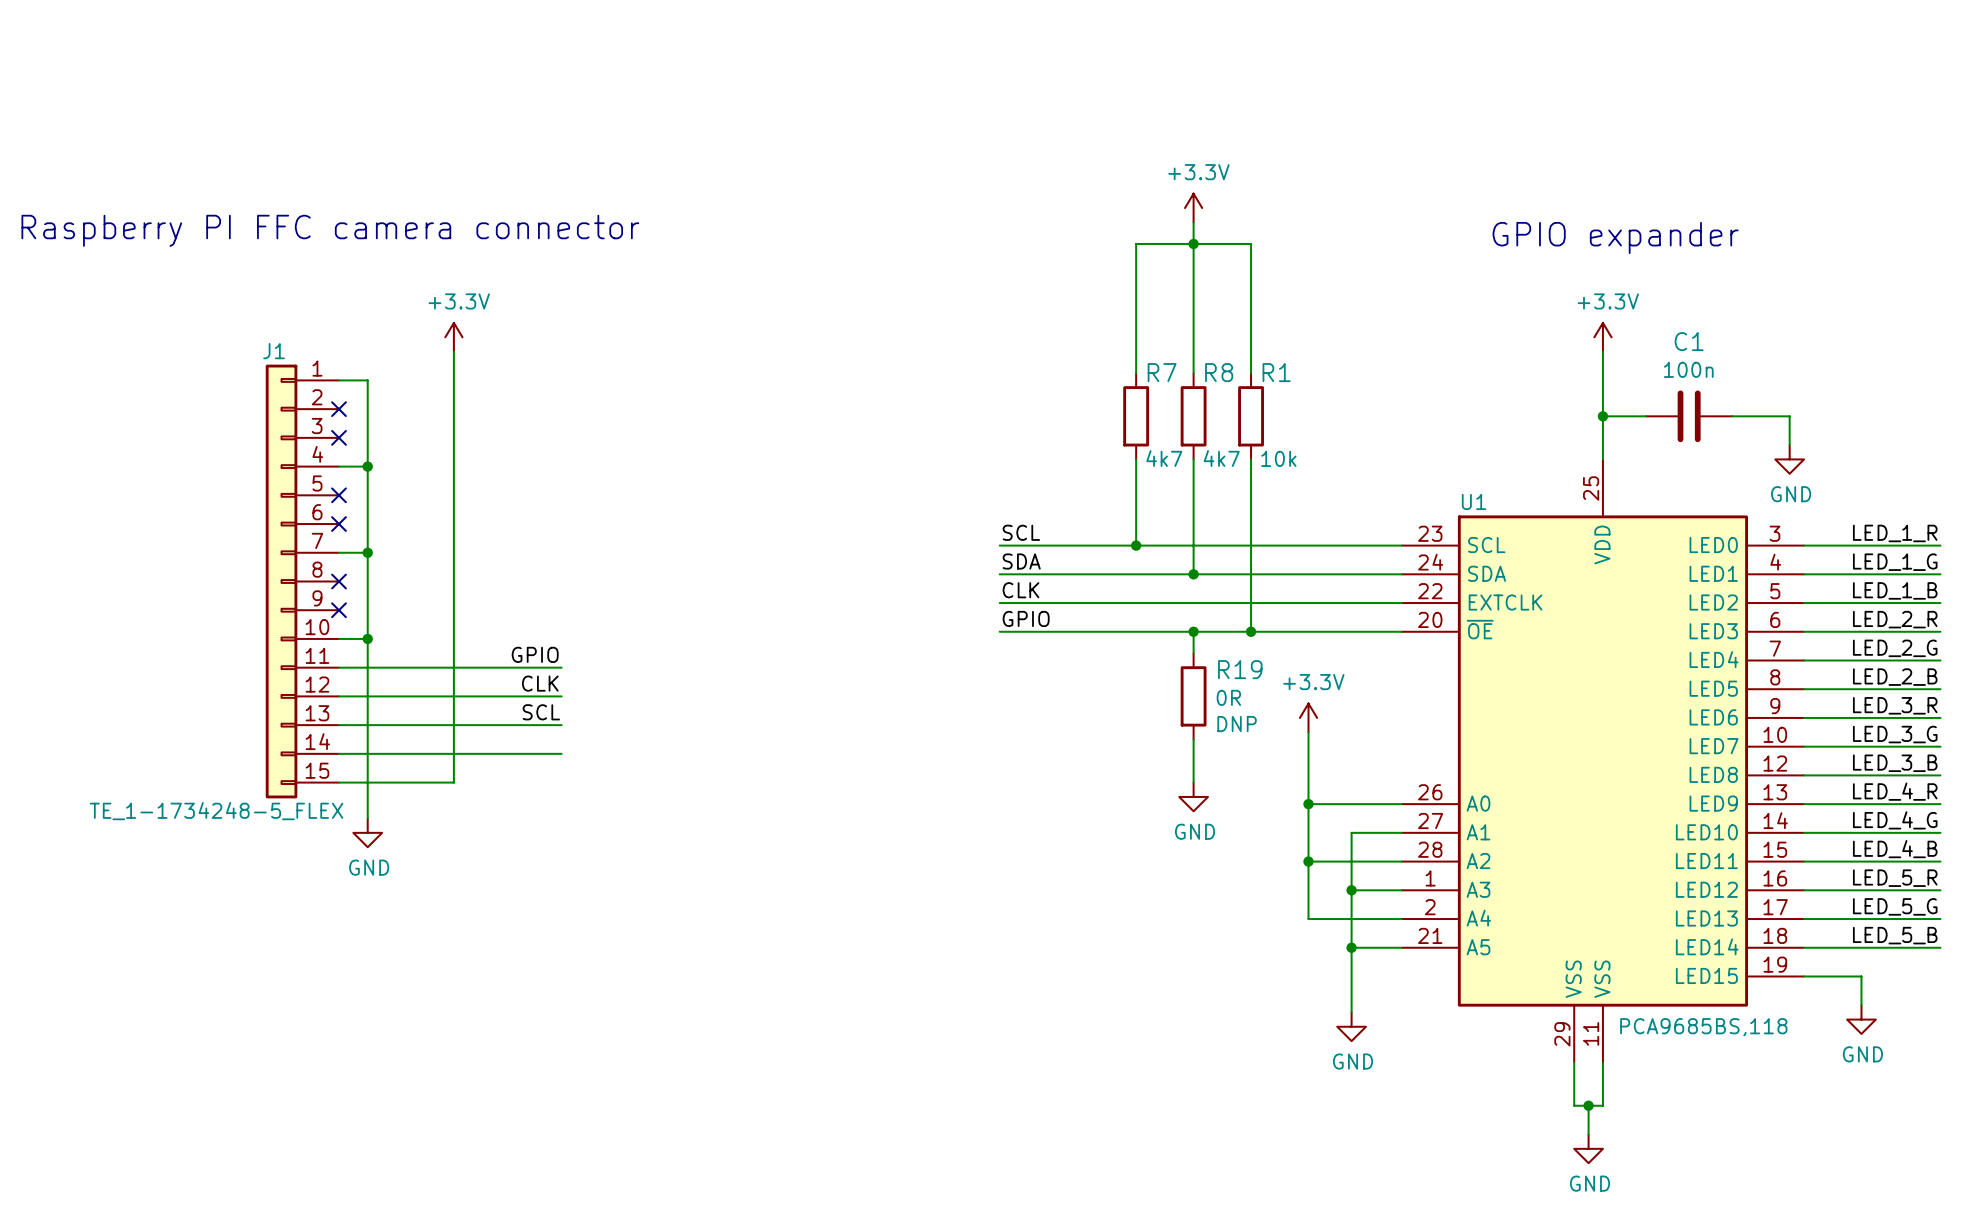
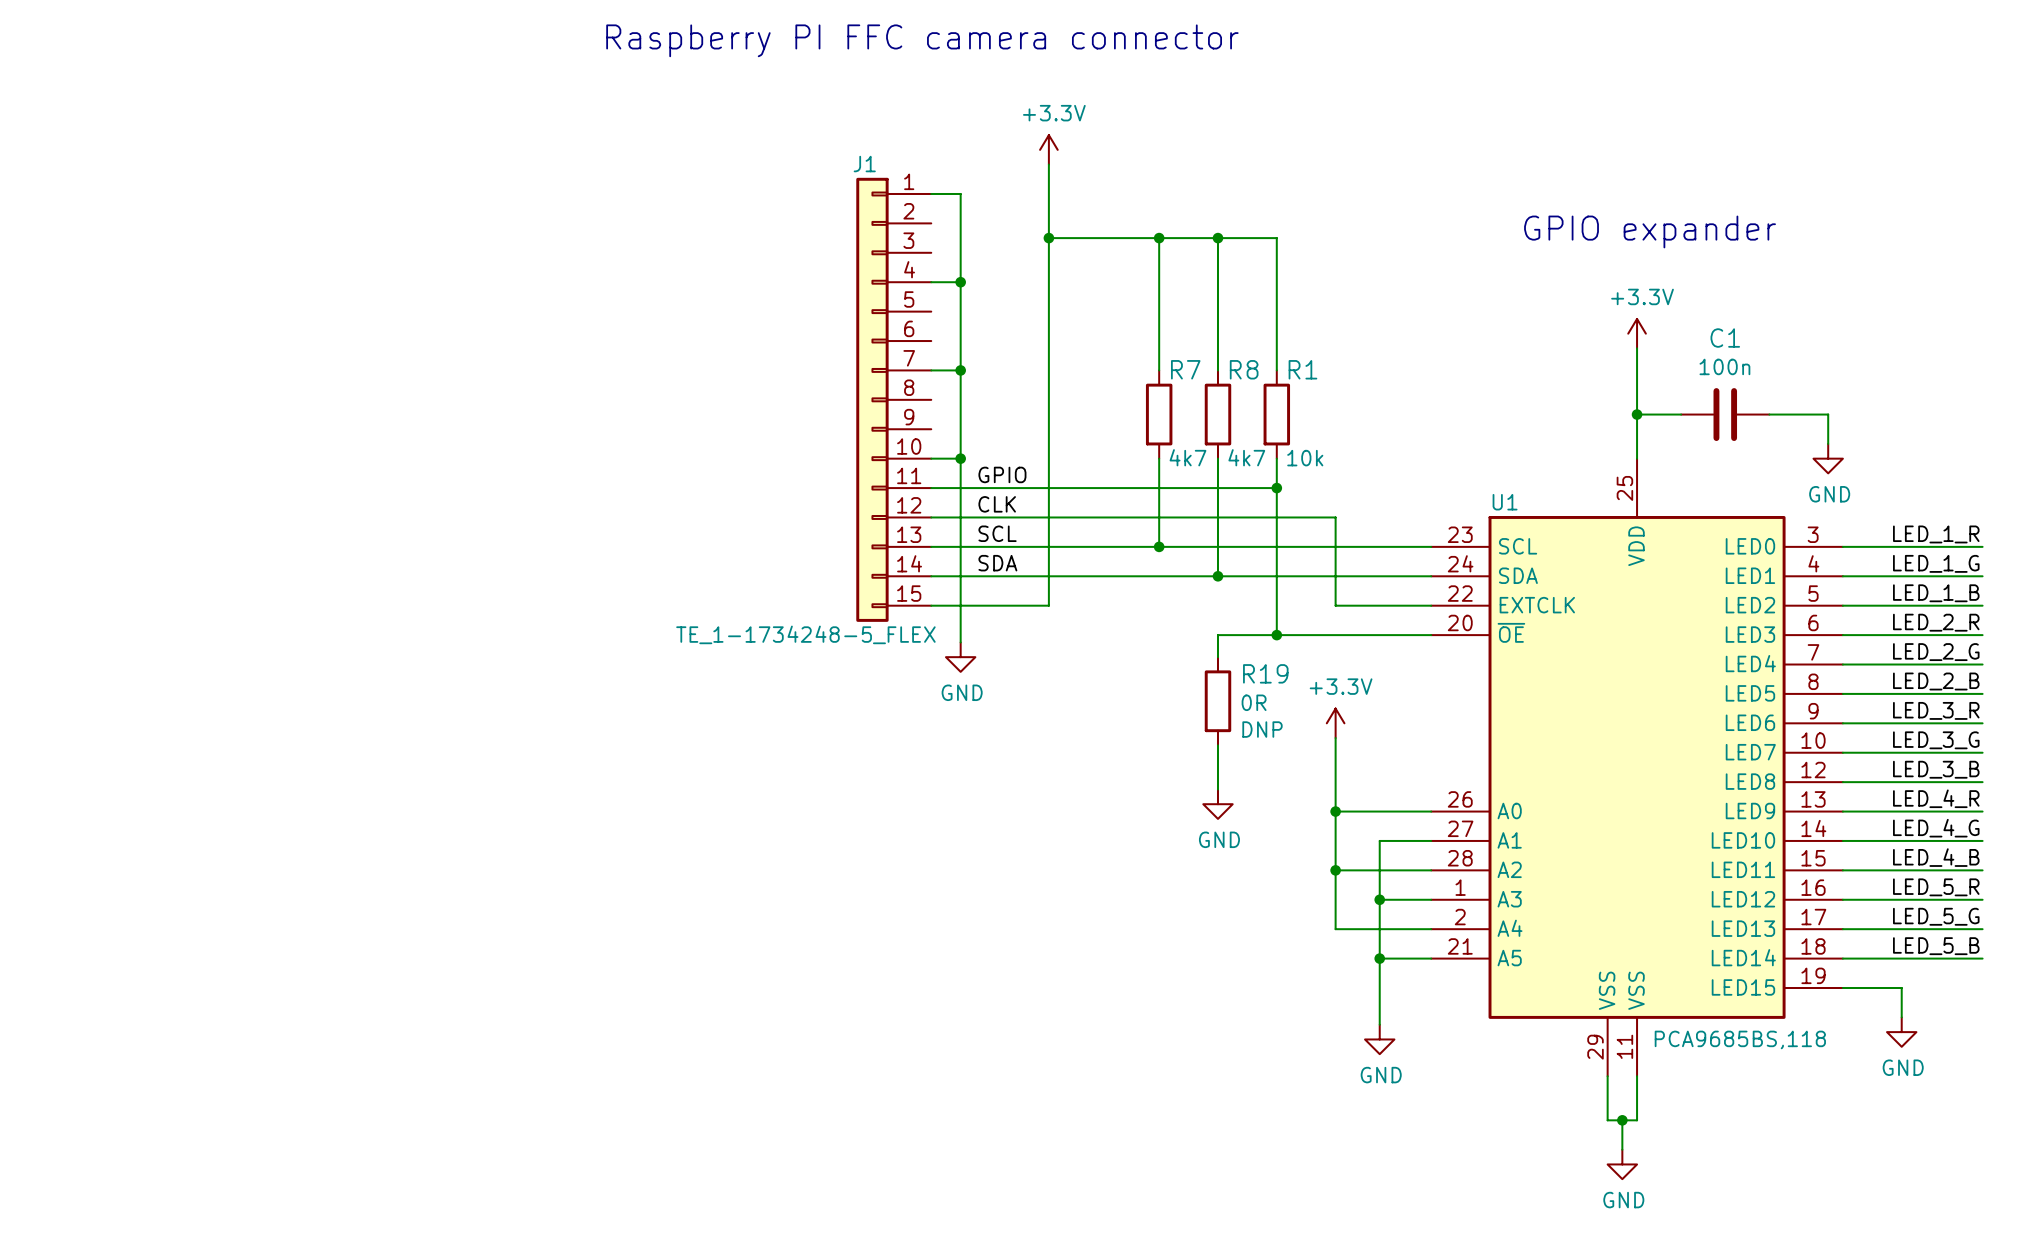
text: none -> Raspberry PI FFC camera connector (922, 40)
wire: none -> (1048, 164) (1048, 605)
wire: none -> (931, 193) (960, 193) (960, 642)
power symbol position: +3.3V (1193, 208) -> +3.3V (1048, 149)
wire: (1193, 222) (1193, 243) -> none
text: Raspberry PI FFC camera connector (330, 230) -> none
wire: none -> (1048, 238) (1159, 238)
junction: none -> (1048, 238)
junction: none -> (1159, 238)
wire: none -> (931, 282) (960, 282)
junction: none -> (960, 282)
power symbol: +3.3V (453, 337) -> none
wire: (453, 351) (453, 782) (339, 782) -> none
wire: none -> (931, 370) (960, 370)
junction: none -> (960, 370)
wire: (339, 380) (367, 380) (367, 818) -> none
no-connect mark: (339, 409) -> none
no-connect mark: (339, 437) -> none
wire: none -> (931, 458) (960, 458)
junction: none -> (960, 458)
wire: (339, 466) (367, 466) -> none
junction: (367, 466) -> none
wire: none -> (931, 488) (1276, 488)
junction: none -> (1276, 488)
no-connect mark: (339, 495) -> none
no-connect mark: (339, 524) -> none
label position: SCL (1021, 532) -> SCL (997, 533)
wire: none -> (931, 546) (1019, 546)
wire: (339, 552) (367, 552) -> none
junction: (367, 552) -> none
label position: SDA (1021, 561) -> SDA (997, 563)
wire: none -> (931, 576) (1019, 576)
J1 position: (302, 581) -> (893, 399)
no-connect mark: (339, 581) -> none
label position: CLK (1021, 590) -> CLK (997, 504)
wire: none -> (931, 605) (1019, 605)
wire: (1028, 603) (1308, 603) -> (931, 517) (1335, 517) (1335, 605)
no-connect mark: (339, 610) -> none
label position: GPIO (1026, 618) -> GPIO (1002, 474)
wire: (999, 631) (1193, 631) -> none
junction: (1193, 631) -> none
wire: (339, 638) (367, 638) -> none
junction: (367, 638) -> none
power symbol: none -> GND (960, 657)
label: GPIO (535, 654) -> none
wire: (339, 667) (561, 667) -> none
label: CLK (540, 683) -> none
wire: (339, 696) (561, 696) -> none
label: SCL (541, 712) -> none
wire: (339, 725) (561, 725) -> none
wire: (339, 753) (561, 753) -> none
power symbol: GND (367, 832) -> none

